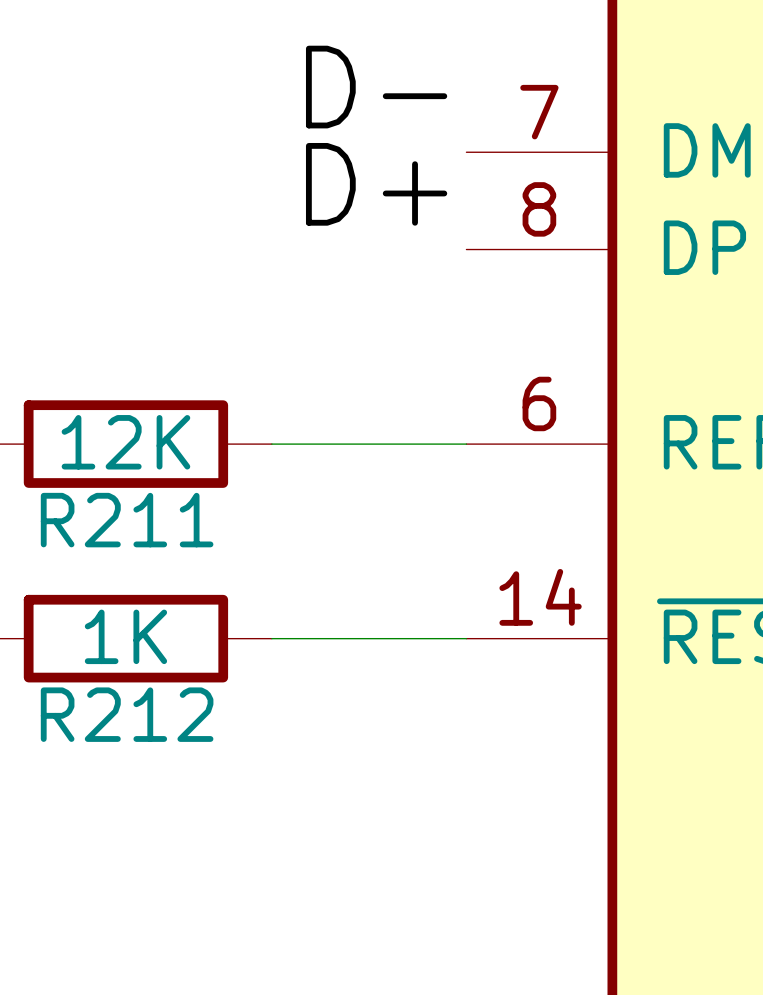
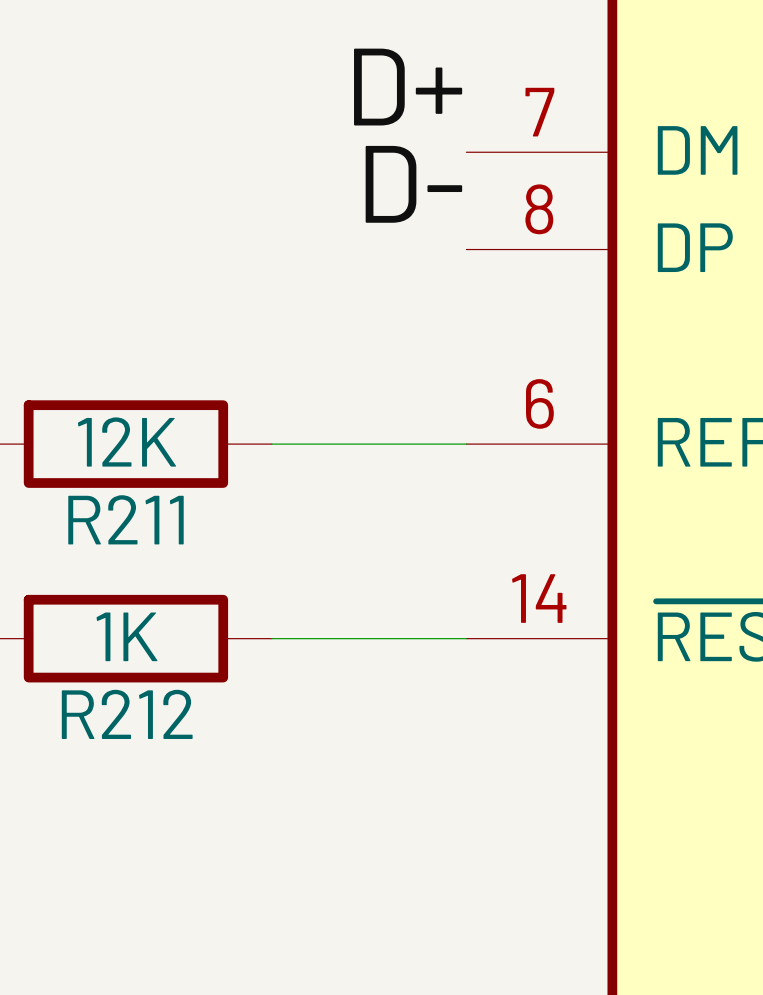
label: D- (376, 87) -> D+ (408, 87)
label: D+ (376, 184) -> D- (413, 184)

